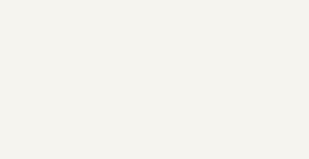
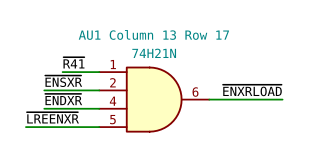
label: none -> ~{R41} (73, 62)
wire: none -> (62, 72) (99, 72)
label: none -> ~{ENSXR} (63, 81)
wire: none -> (44, 90) (99, 90)
label: none -> ~{ENXRLOAD} (252, 90)
label: none -> ~{ENDXR} (63, 99)
part: none -> 74H21N (154, 99)
wire: none -> (209, 99) (282, 99)
wire: none -> (44, 108) (99, 108)
label: none -> ~{LREENXR} (52, 117)
wire: none -> (25, 127) (99, 127)

